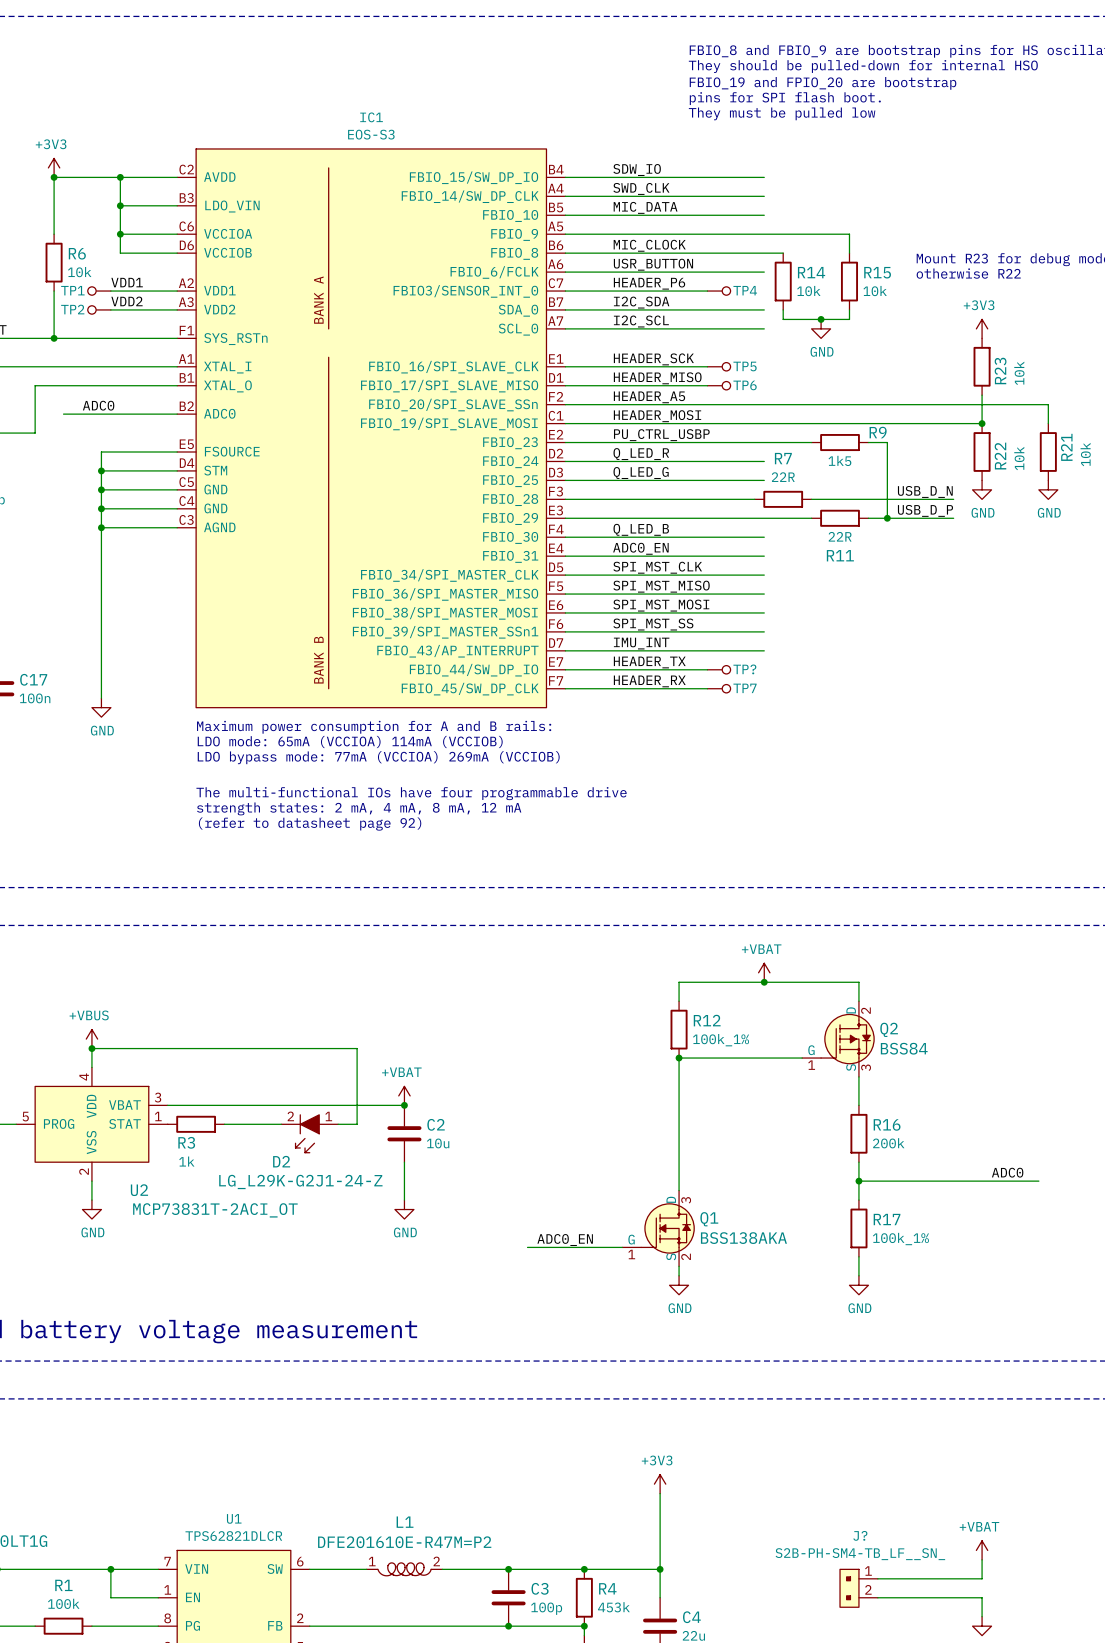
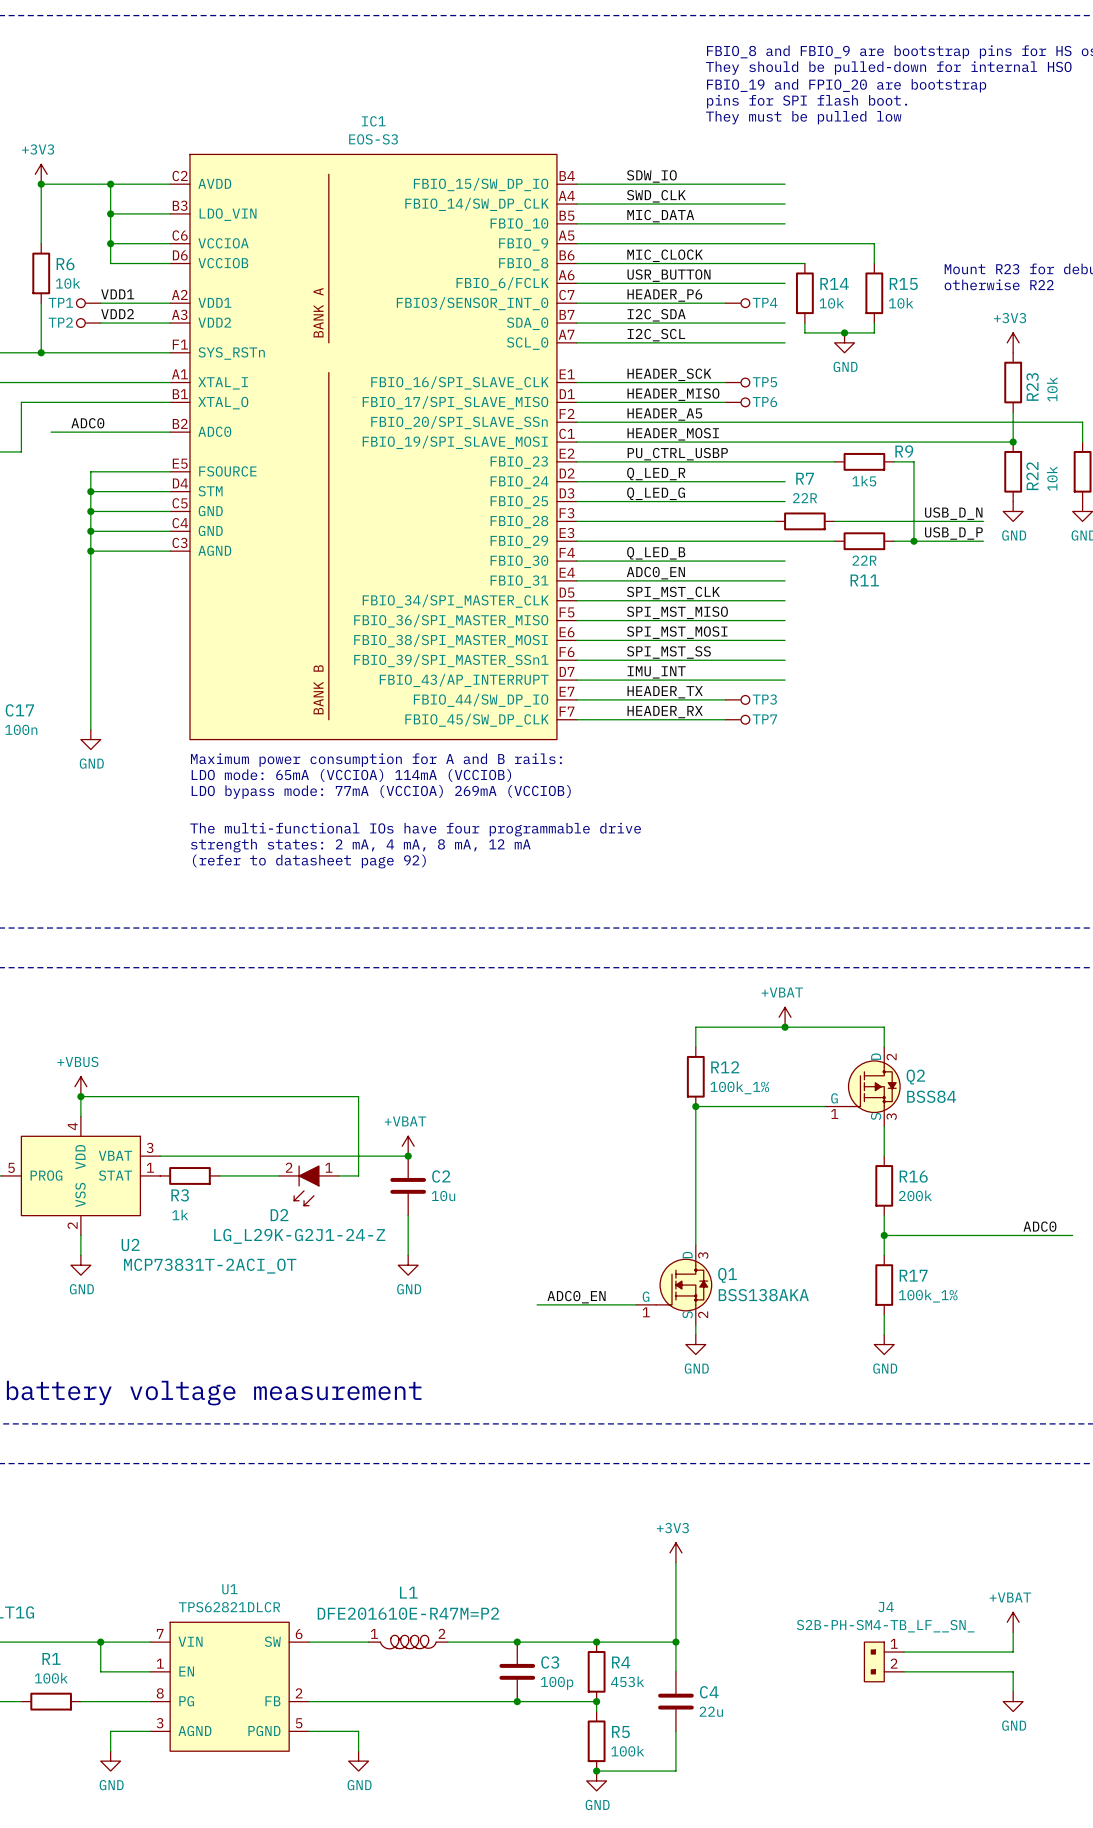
TP? name: TP? (744, 669) -> TP3 (764, 699)
J? name: J? (860, 1535) -> J4 (886, 1607)

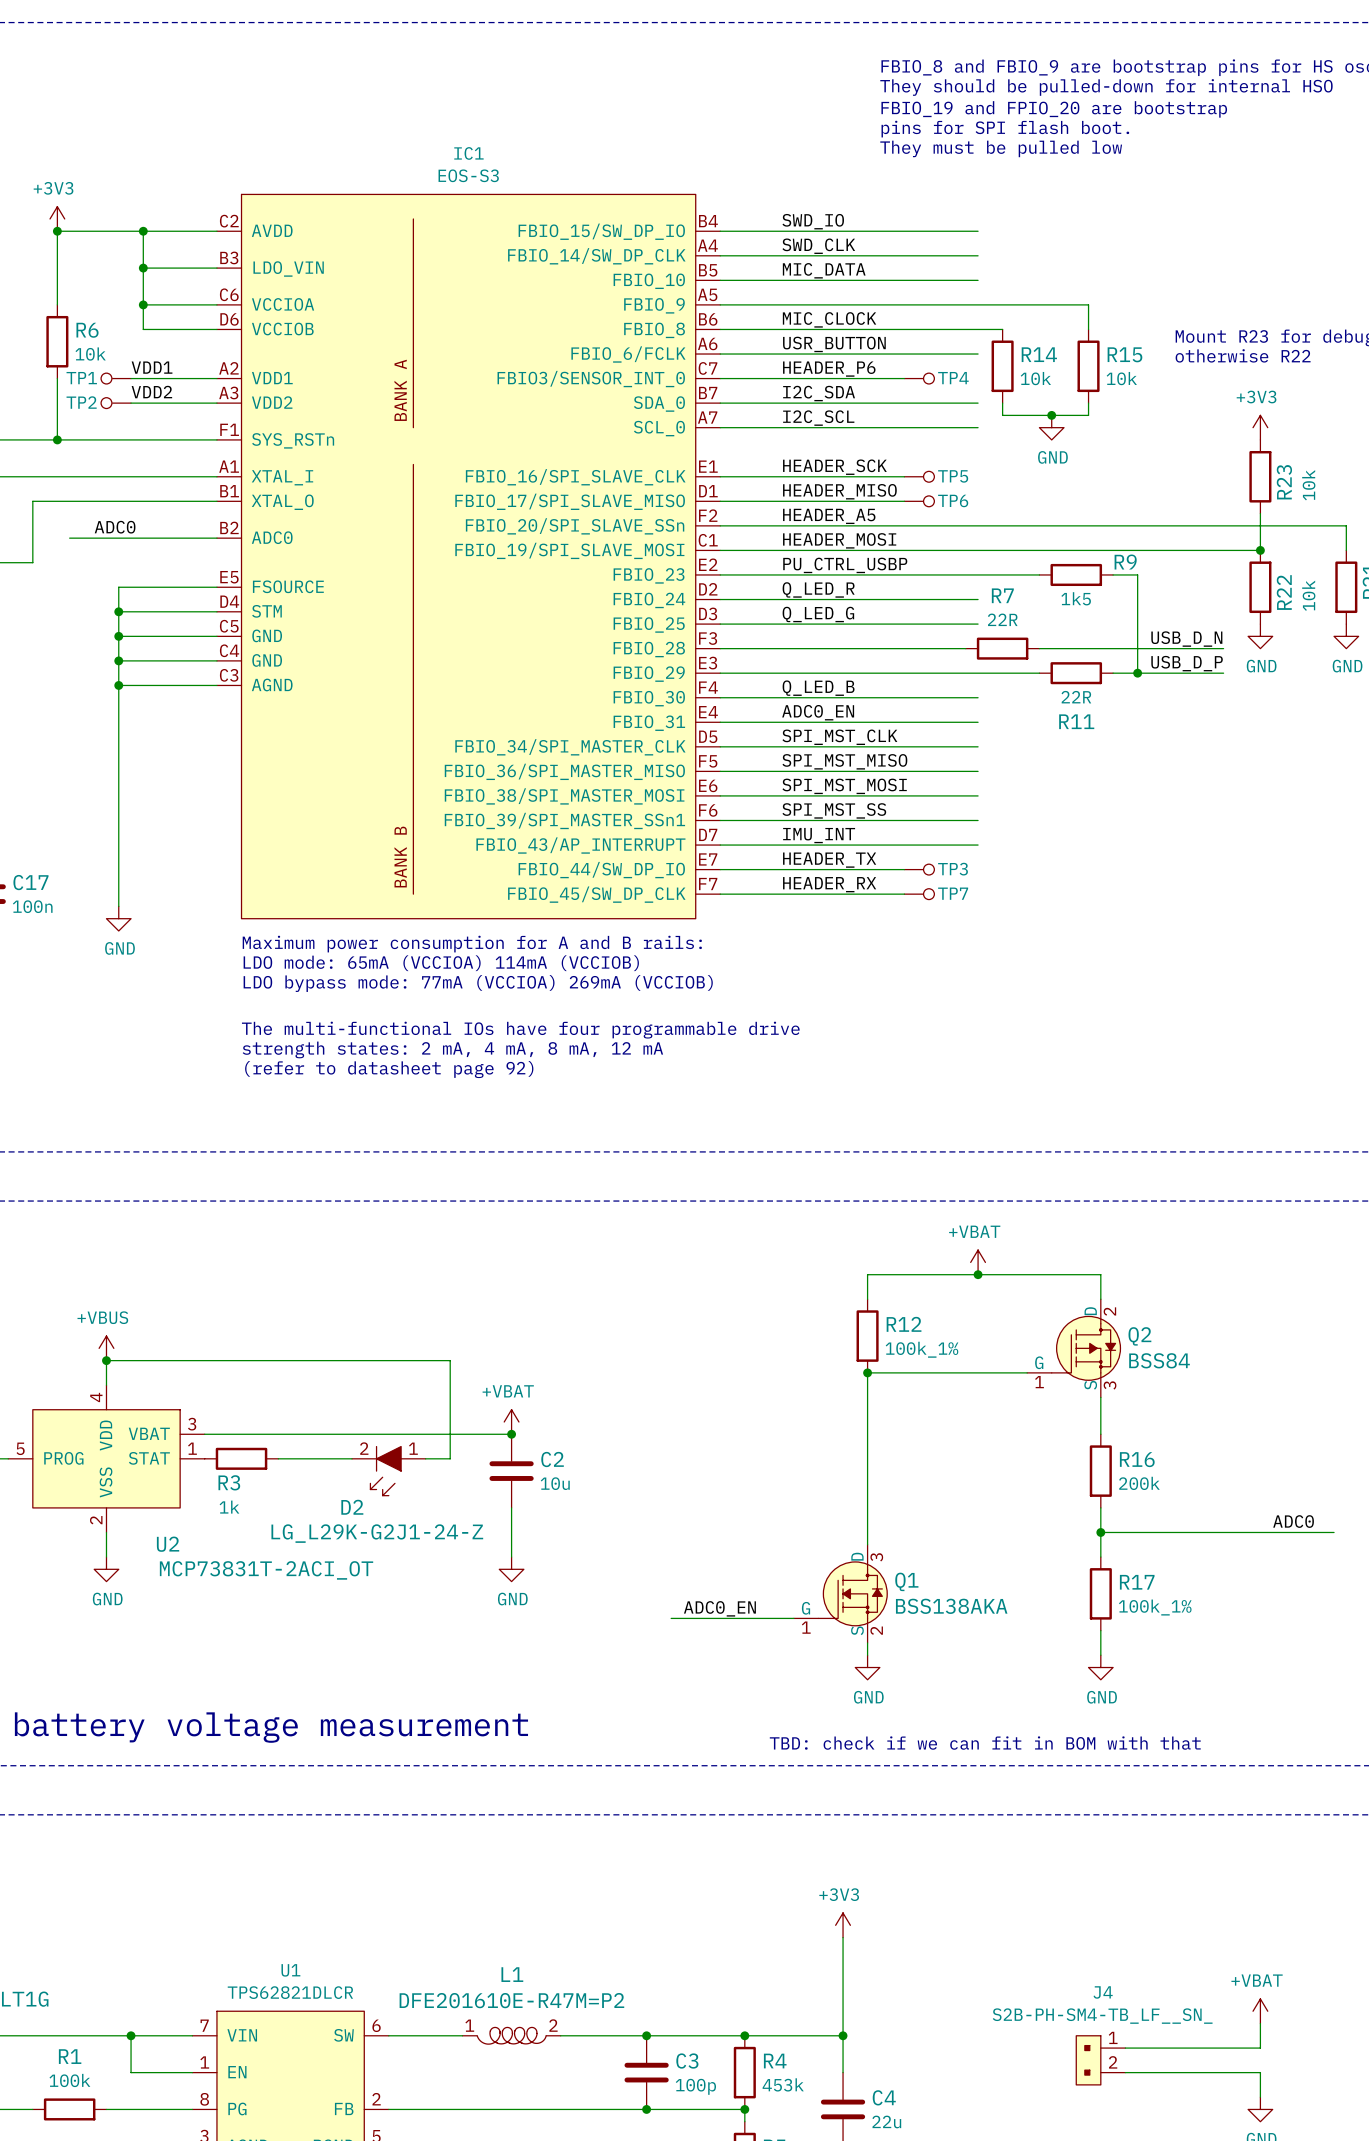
label: SDW_IO (651, 176) -> SWD_IO (813, 221)
text: none -> TBD: check if we can fit in BOM with that (985, 1743)

